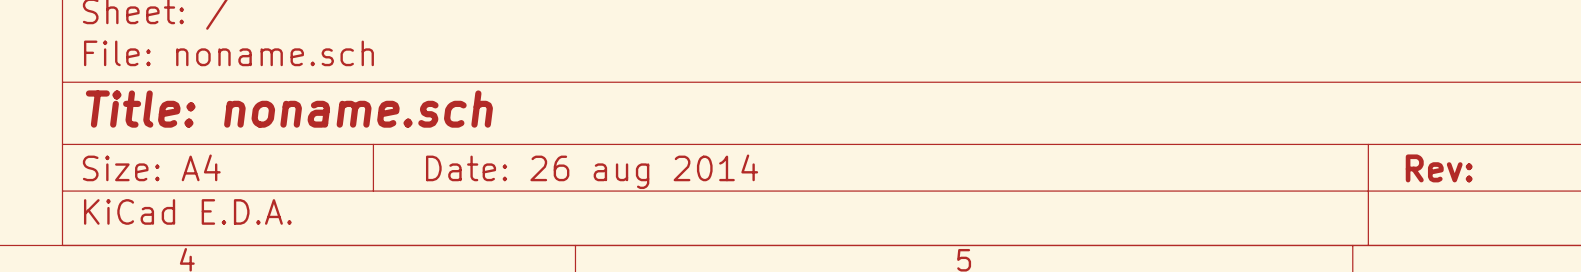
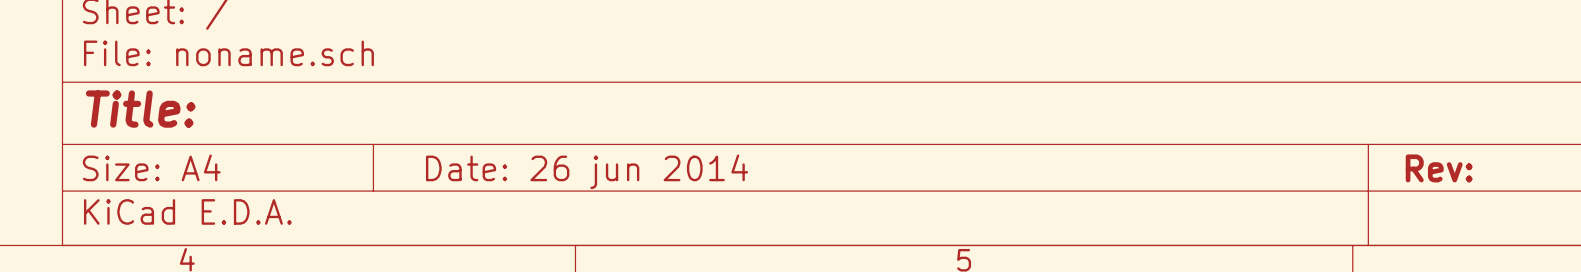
title block: Title: noname.sch (289, 109) -> Title: (140, 109)
title block: Date: 26 aug 2014 (592, 171) -> Date: 26 jun 2014 (587, 171)

